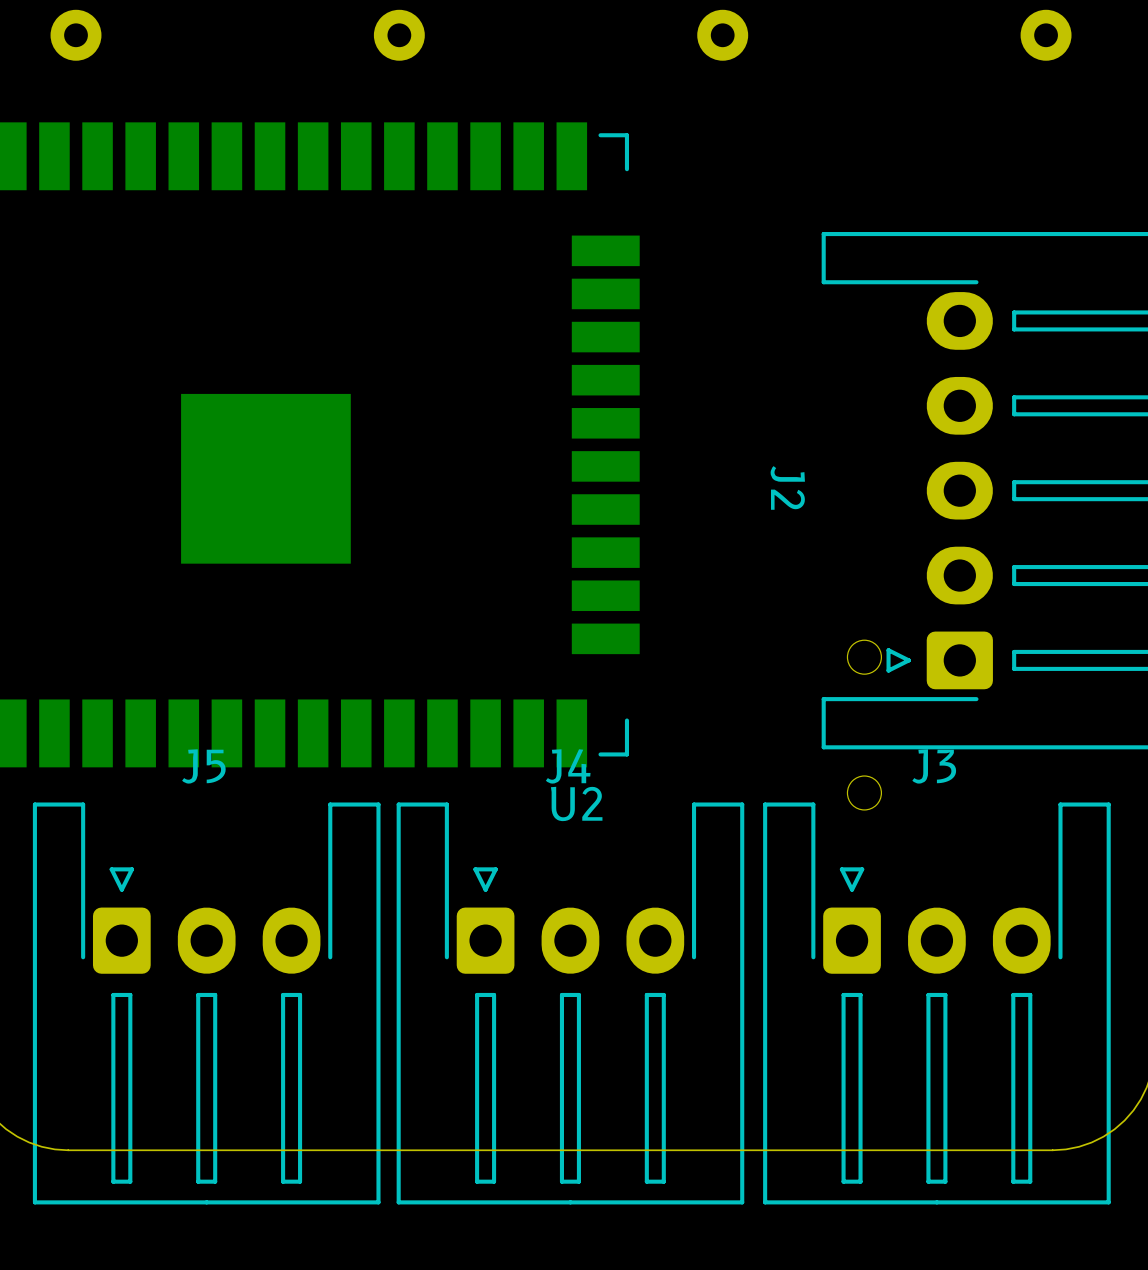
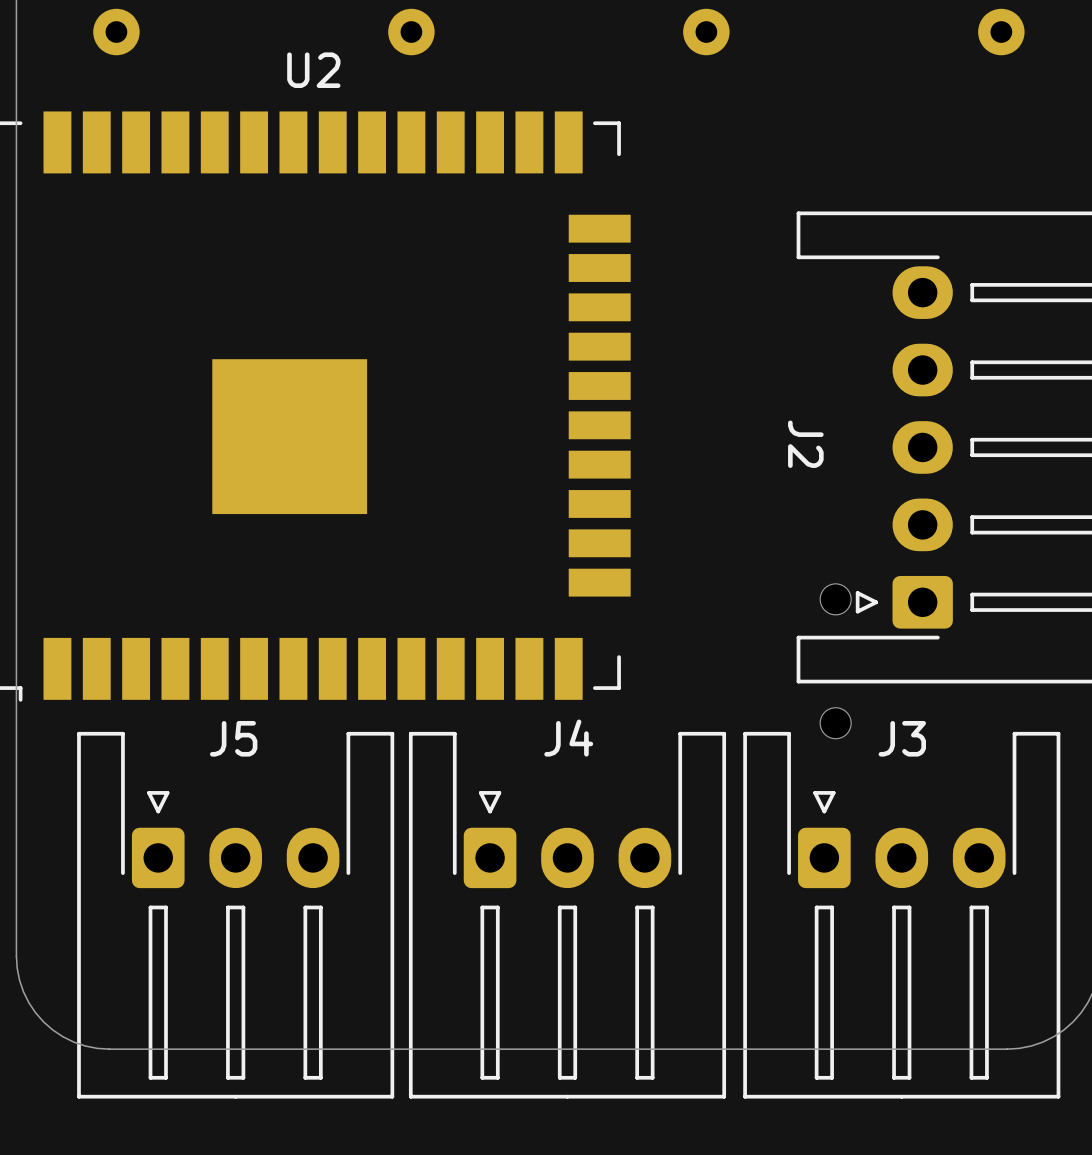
J2 name position: J2 (787, 487) -> J2 (805, 444)
J5 name position: J5 (203, 766) -> J5 (233, 738)
J4 name position: J4 (568, 766) -> J4 (568, 738)
J3 name position: J3 (934, 766) -> J3 (902, 738)
U2 name position: U2 (576, 803) -> U2 (313, 70)

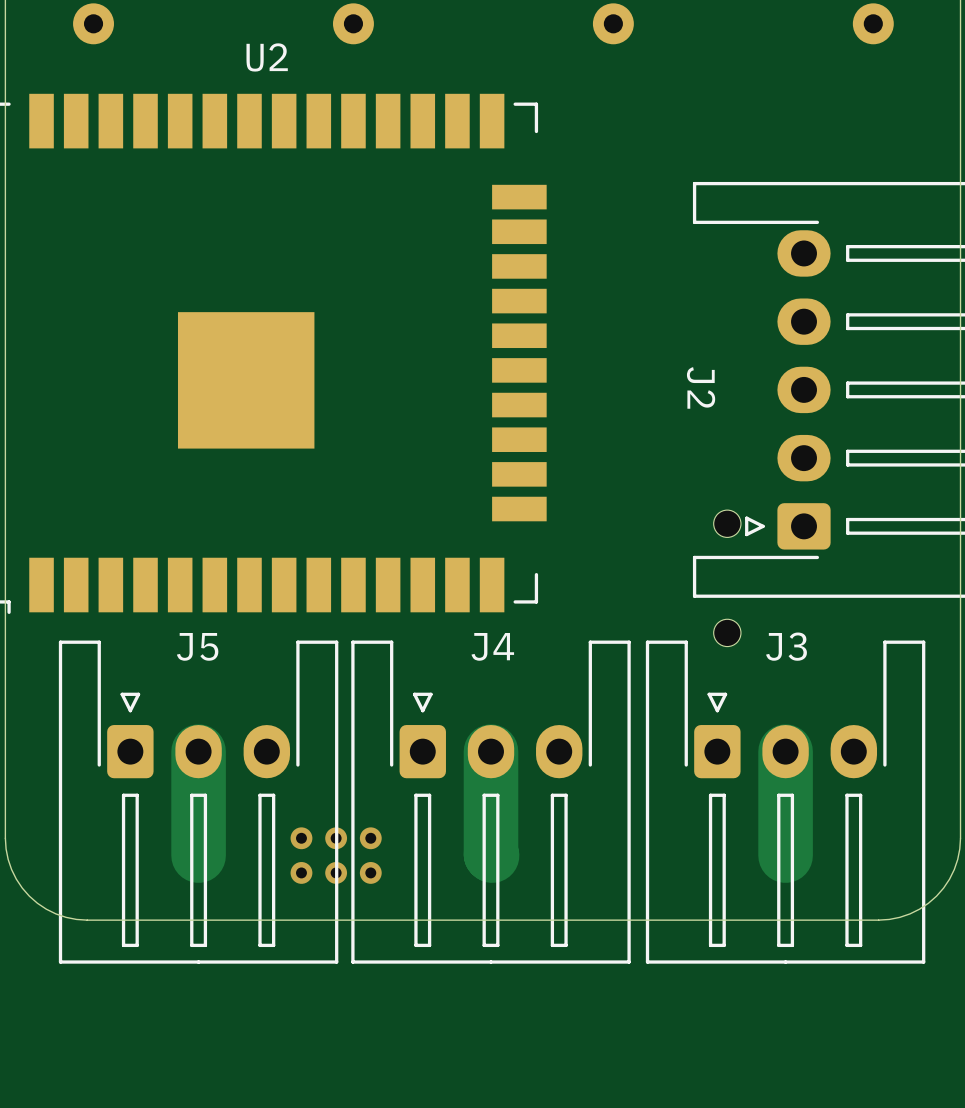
track: none -> (198, 751) (198, 855)
track: none -> (491, 751) (492, 855)
track: none -> (785, 751) (785, 855)
via: none -> (301, 838)
via: none -> (336, 838)
via: none -> (370, 838)
via: none -> (301, 872)
via: none -> (336, 872)
via: none -> (370, 872)

